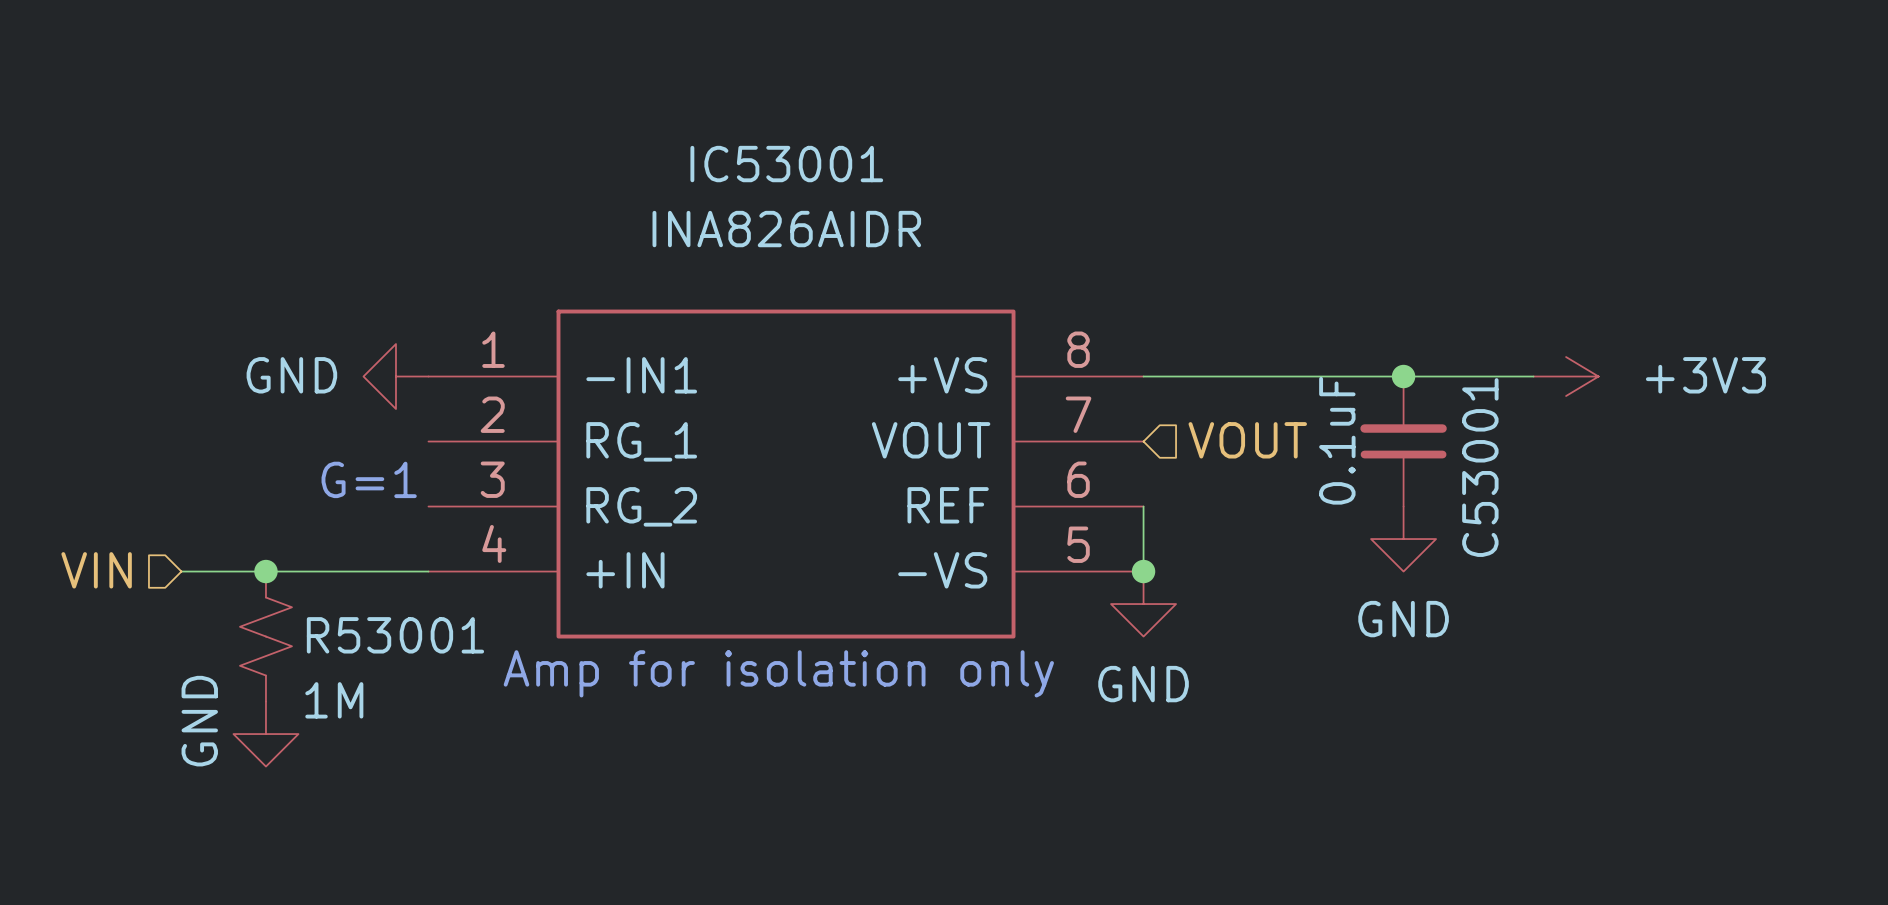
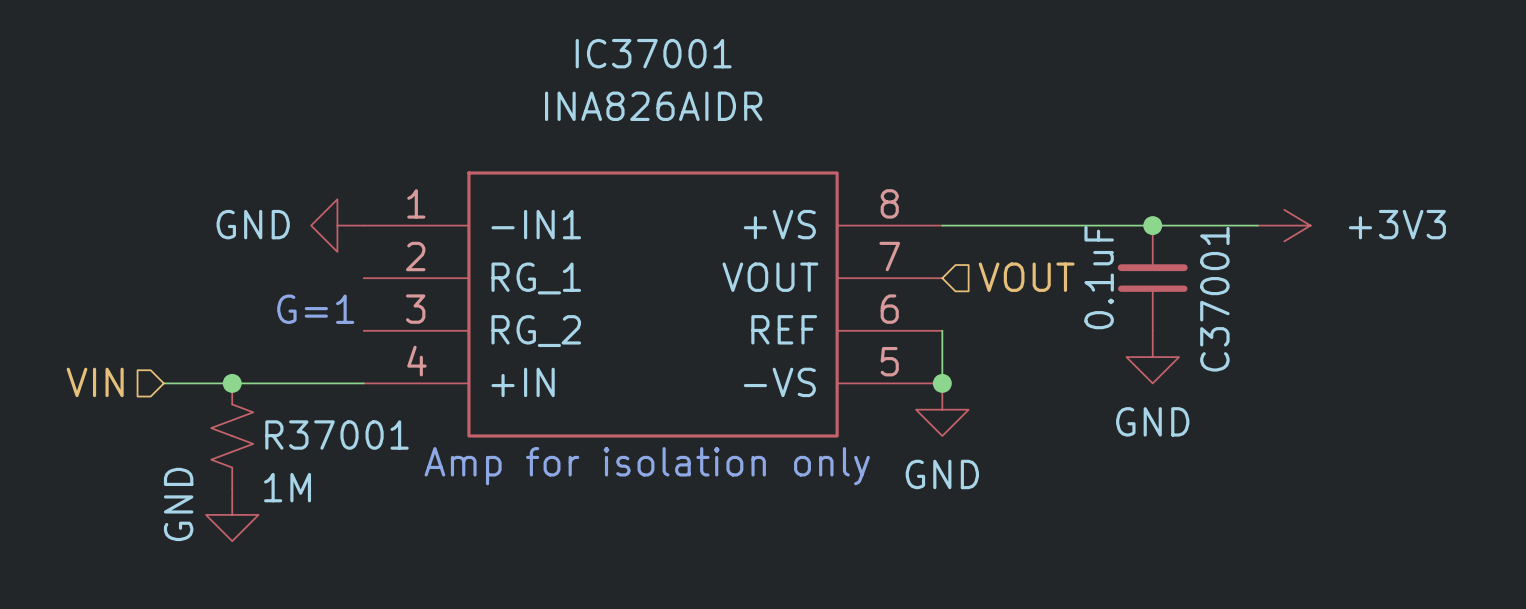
IC53001 name: IC53001 (786, 164) -> IC37001 (653, 53)
C53001 name: C53001 (1480, 467) -> C37001 (1214, 299)
R53001 name: R53001 (395, 635) -> R37001 (336, 435)

